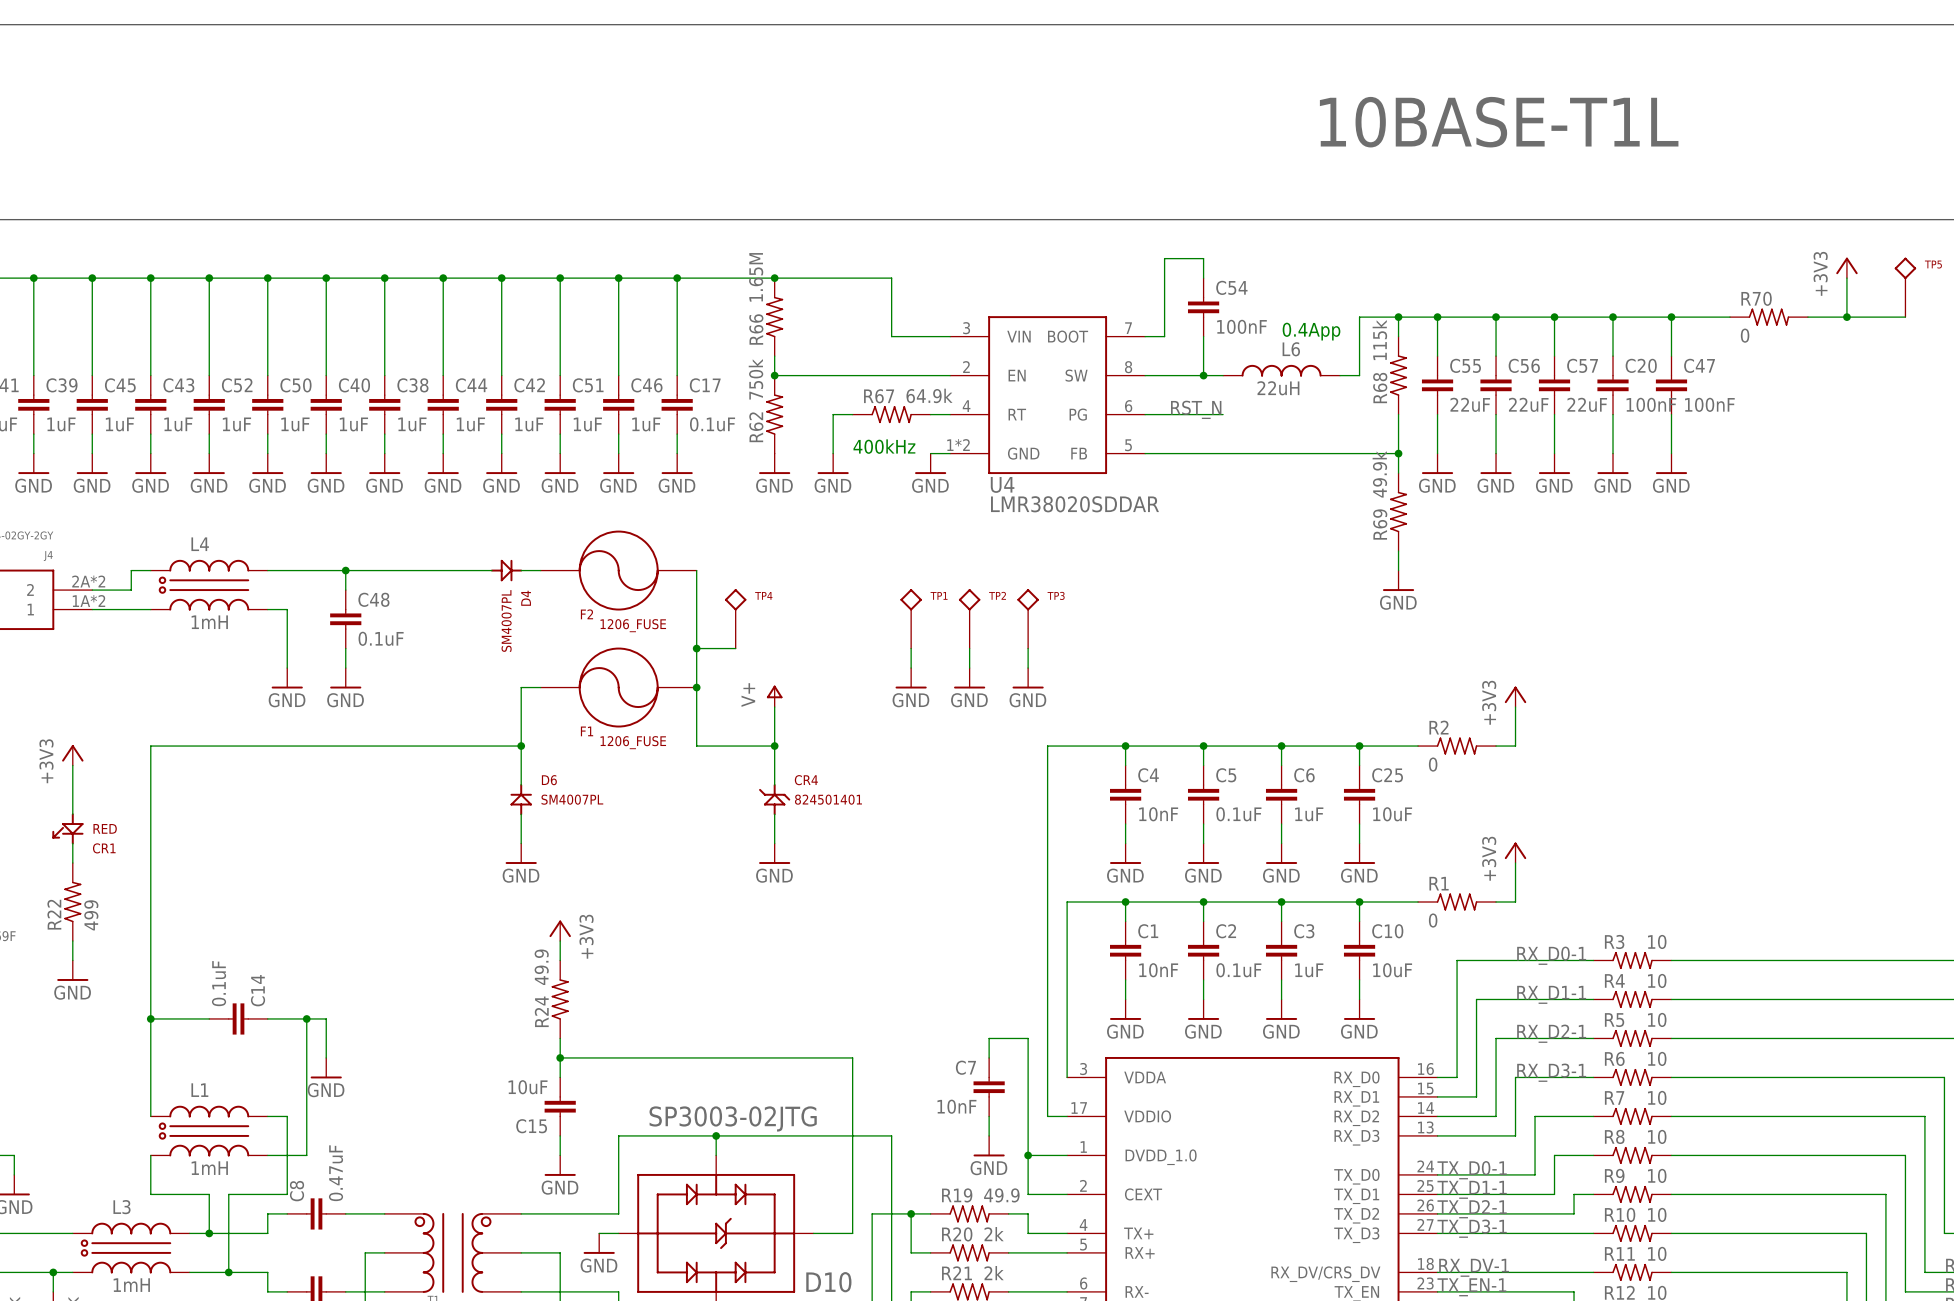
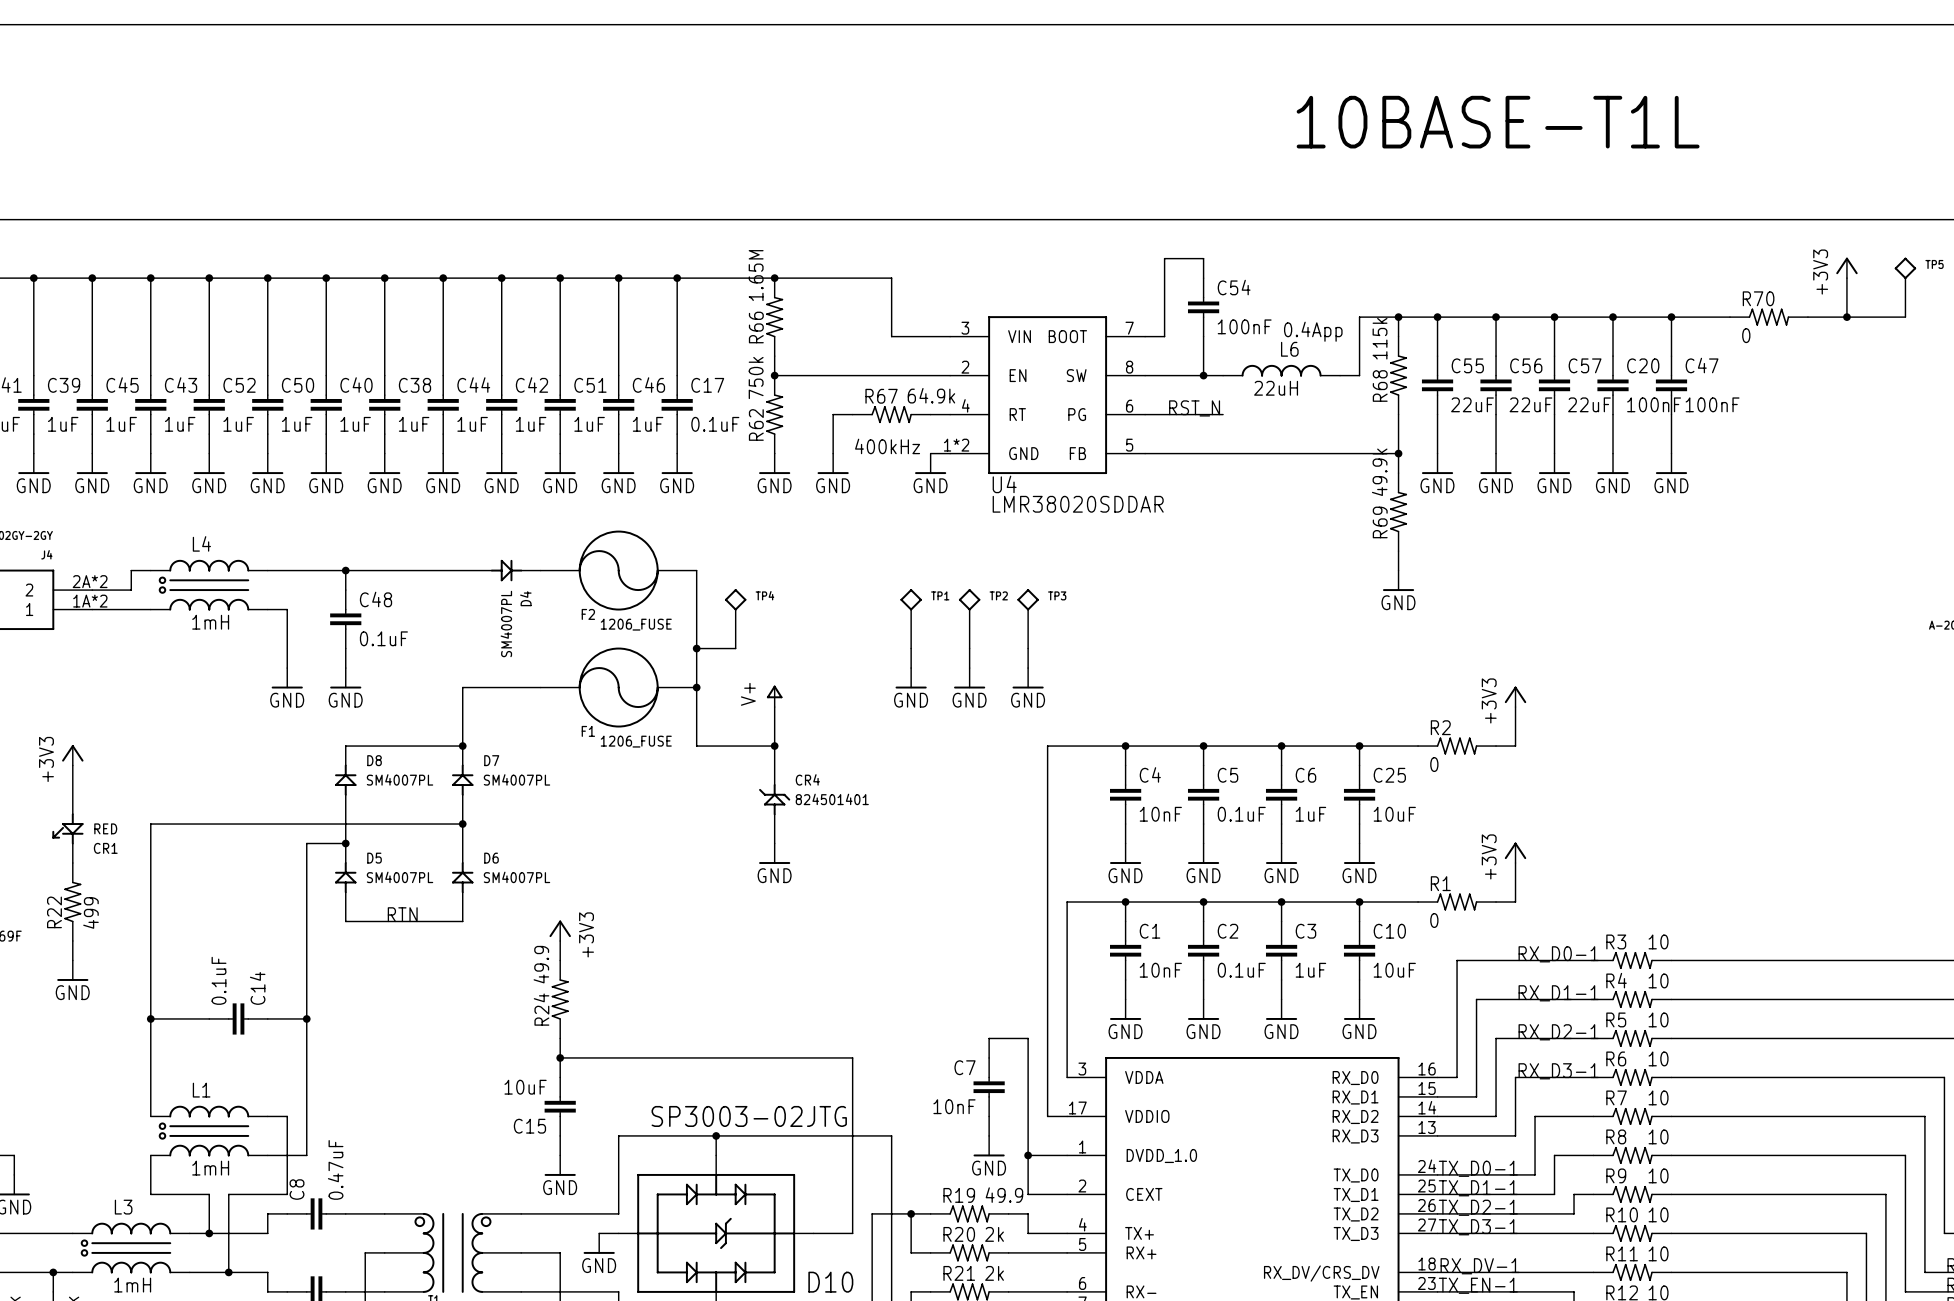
wire: (521, 687) (521, 785) -> (521, 687) (462, 687) (462, 765)
wire: (345, 746) (150, 746) (150, 824) -> (462, 824) (150, 824)
wire: none -> (345, 746) (345, 765)
wire: (462, 746) (521, 746) -> none
junction: none -> (462, 746)
junction: (521, 746) -> none
D8: none -> SM4007PL (345, 780)
D7: none -> SM4007PL (462, 780)
wire: none -> (345, 794) (345, 863)
wire: none -> (462, 794) (462, 863)
D6 position: (521, 799) -> (462, 877)
wire: (521, 814) (521, 843) -> none
junction: none -> (462, 824)
junction: none -> (345, 843)
power symbol: GND (521, 853) -> none
D5: none -> SM4007PL (345, 877)
wire: none -> (345, 892) (345, 921) (462, 921) (462, 892)
label: none -> RTN (402, 914)
wire: (306, 1018) (326, 1018) (326, 1057) -> (306, 1018) (306, 843) (345, 843)
power symbol: GND (326, 1068) -> none

